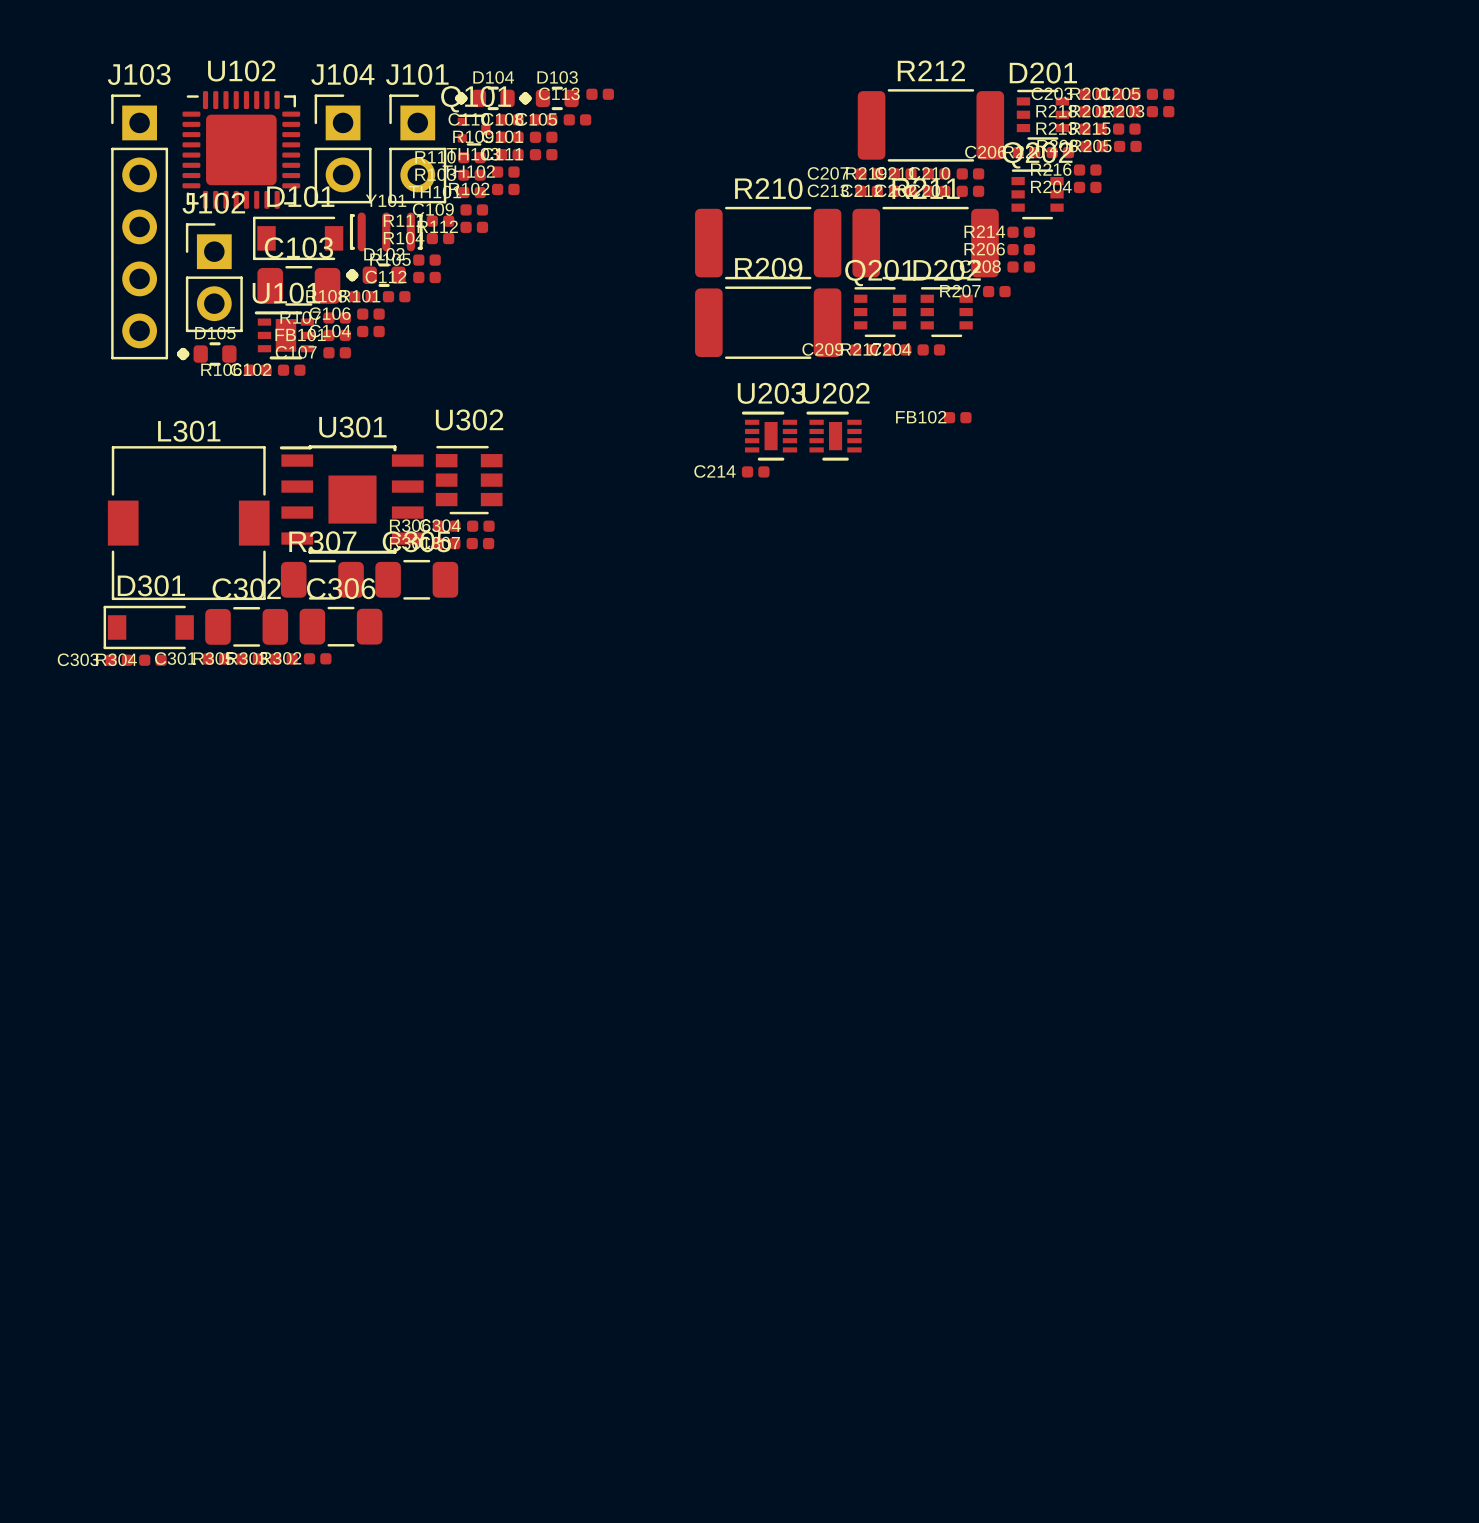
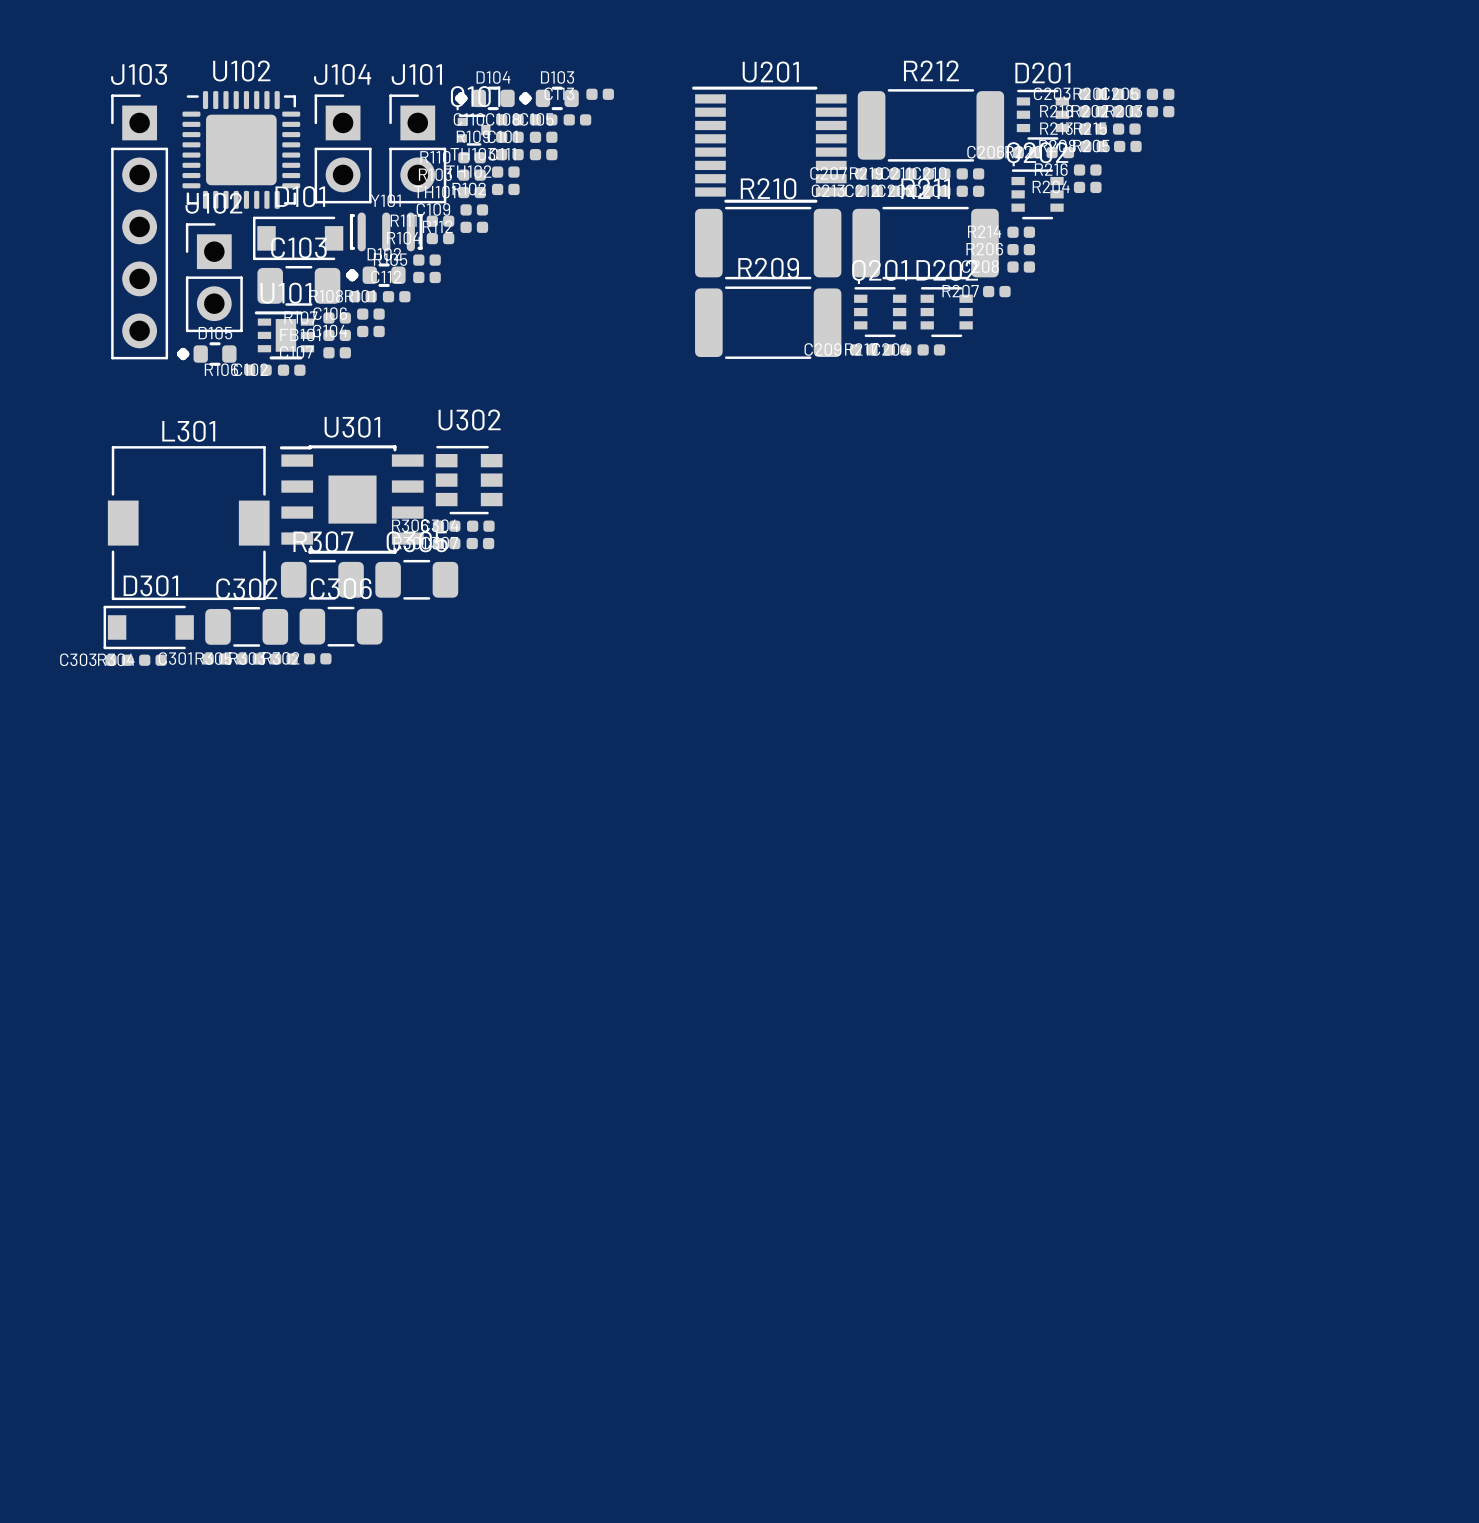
U201: none -> (769, 144)
FB102: (957, 417) -> none
U203: (769, 436) -> none
U202: (834, 436) -> none
C214: (755, 471) -> none

